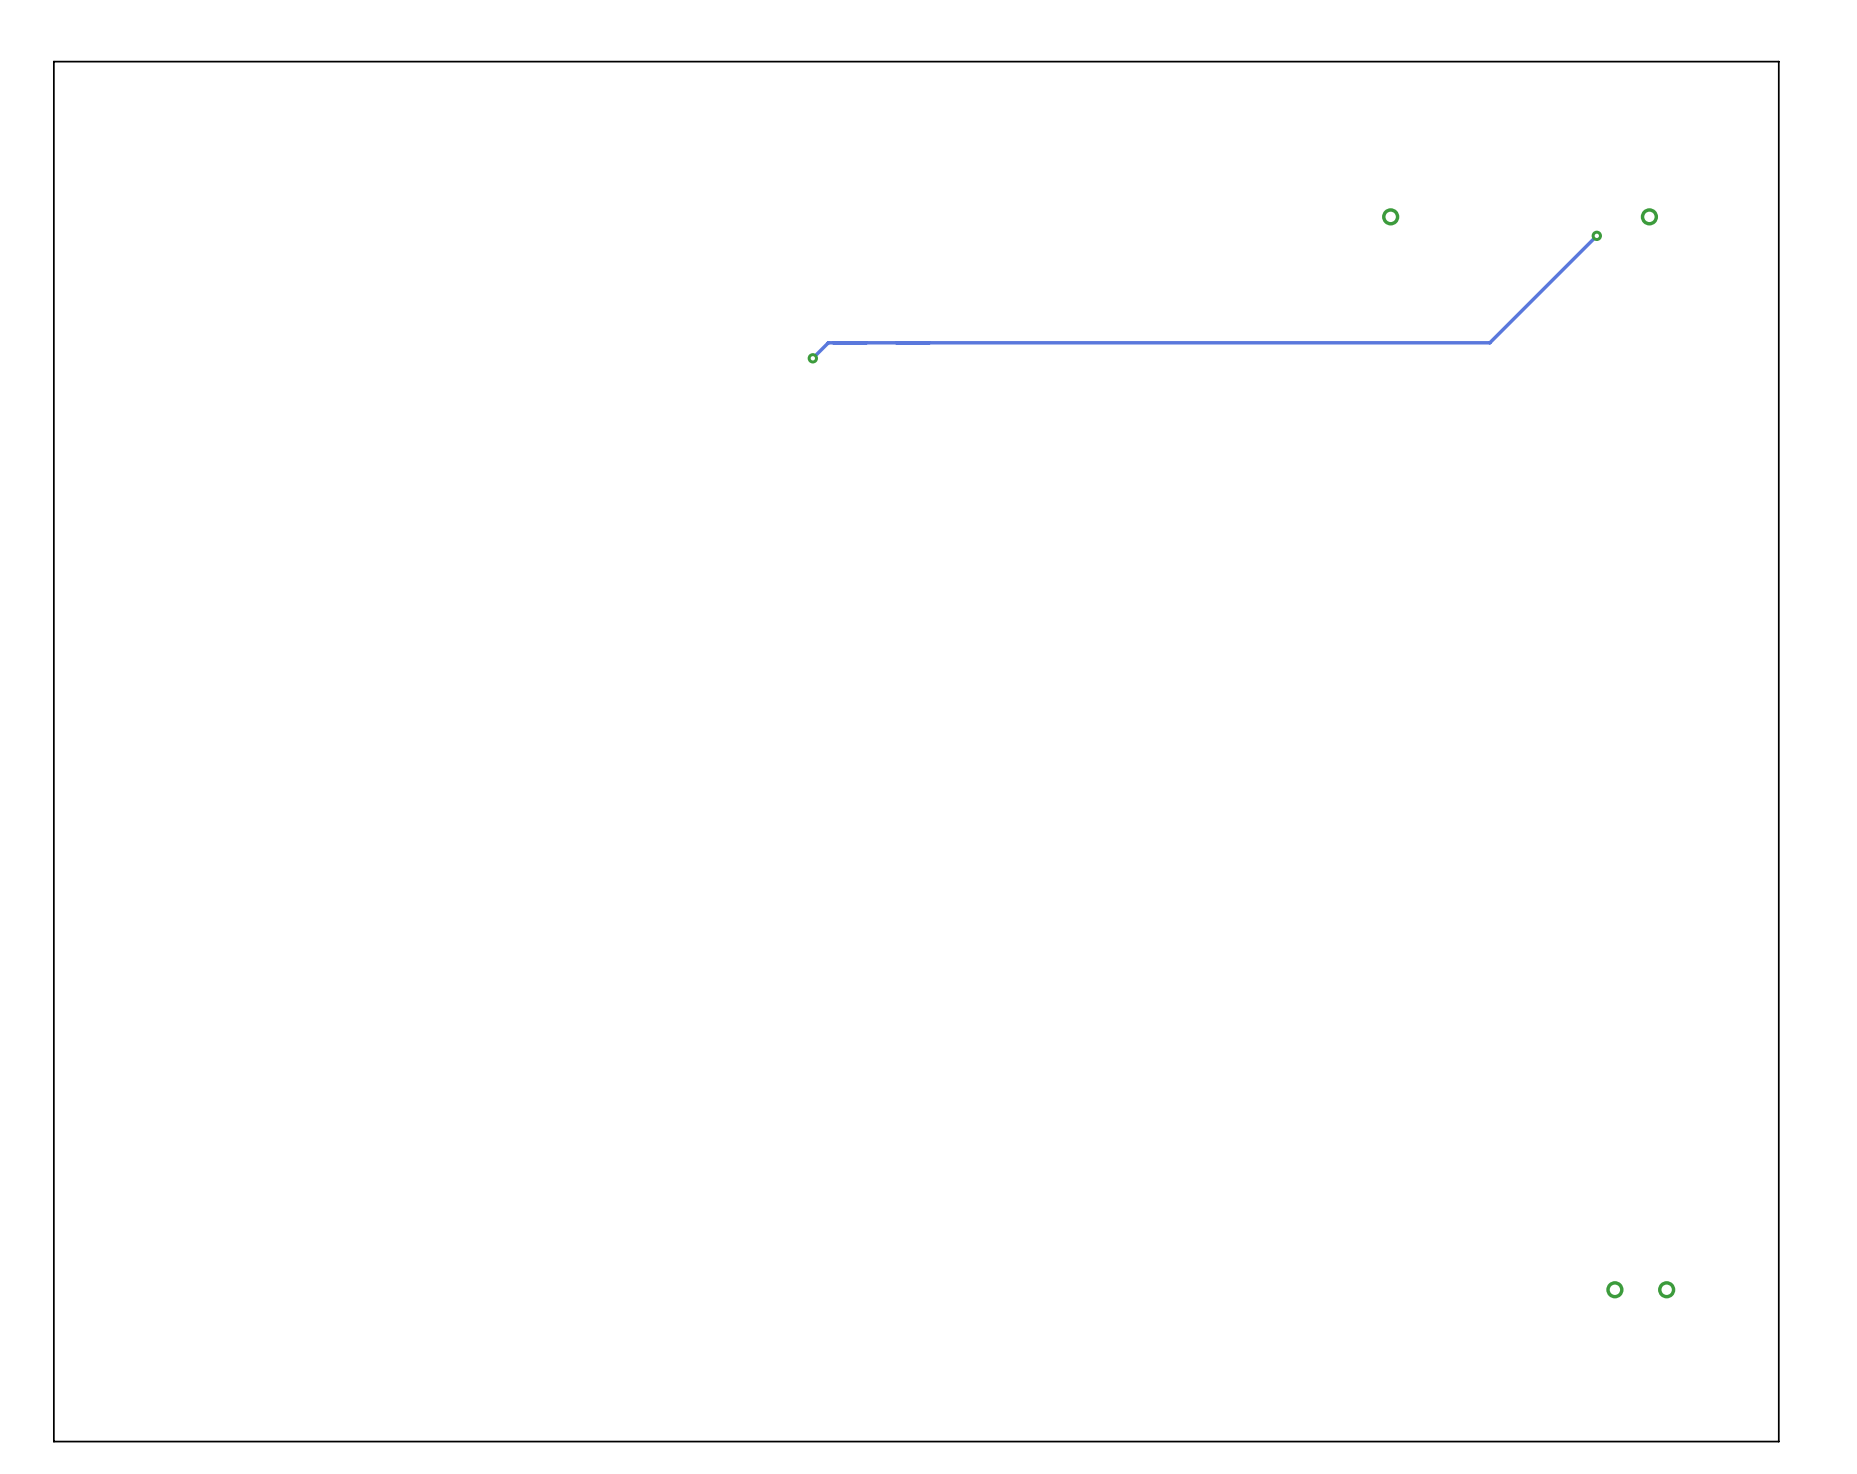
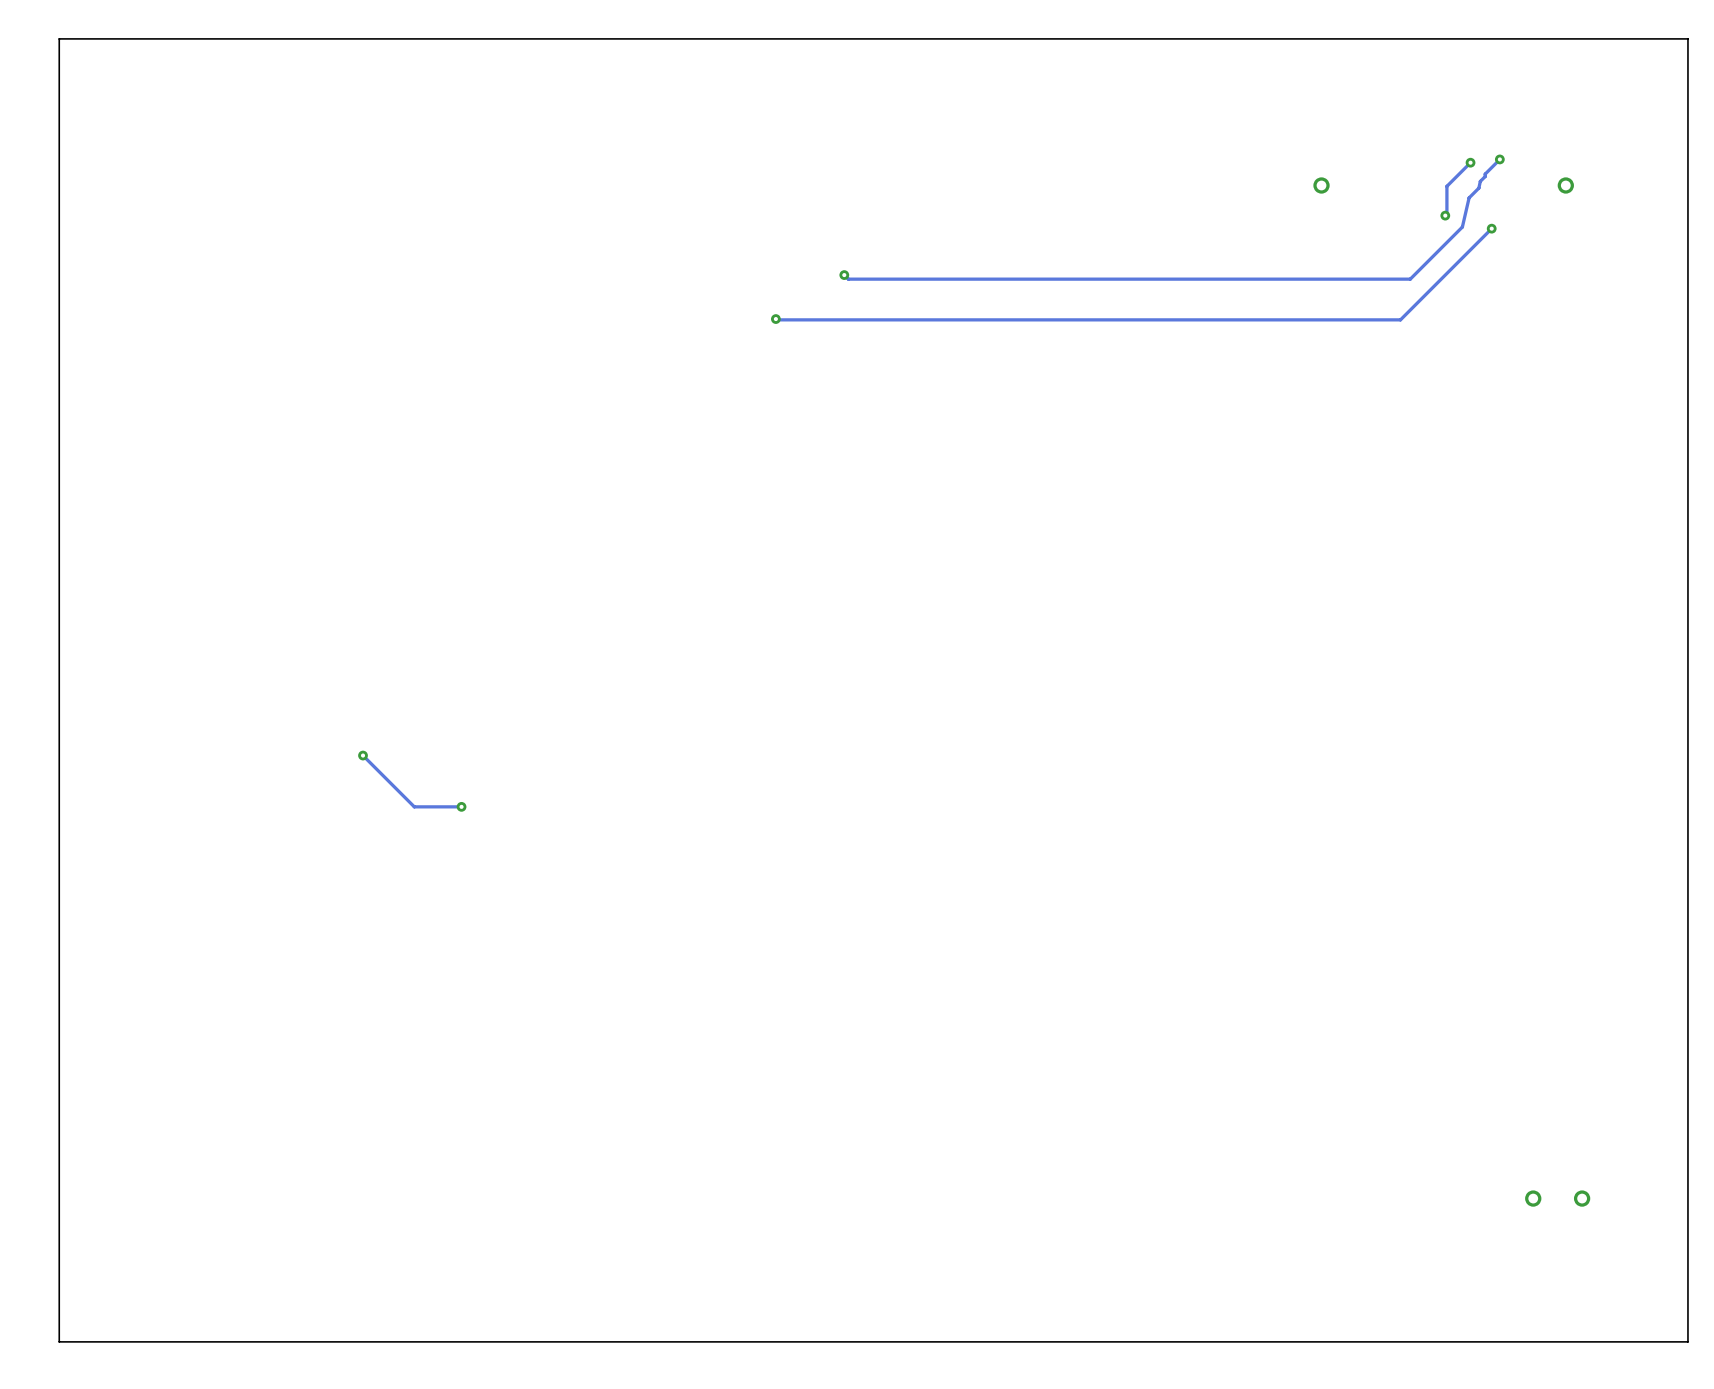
track: none -> (1499, 159) (1485, 174) (1478, 188) (1469, 197) (1462, 227) (1410, 279) (848, 279) (844, 275)
via: none -> (1499, 159)
track: none -> (1470, 162) (1446, 186) (1446, 215) (1445, 215)
via: none -> (1470, 162)
track: (1596, 235) (1489, 342) (828, 342) (812, 358) -> none
via: (1596, 235) -> none
via: none -> (1445, 215)
track: none -> (1491, 228) (1400, 319) (775, 319)
via: none -> (1491, 228)
via: none -> (844, 275)
track: none -> (363, 755) (414, 806) (461, 806)
via: none -> (363, 755)
via: none -> (461, 806)

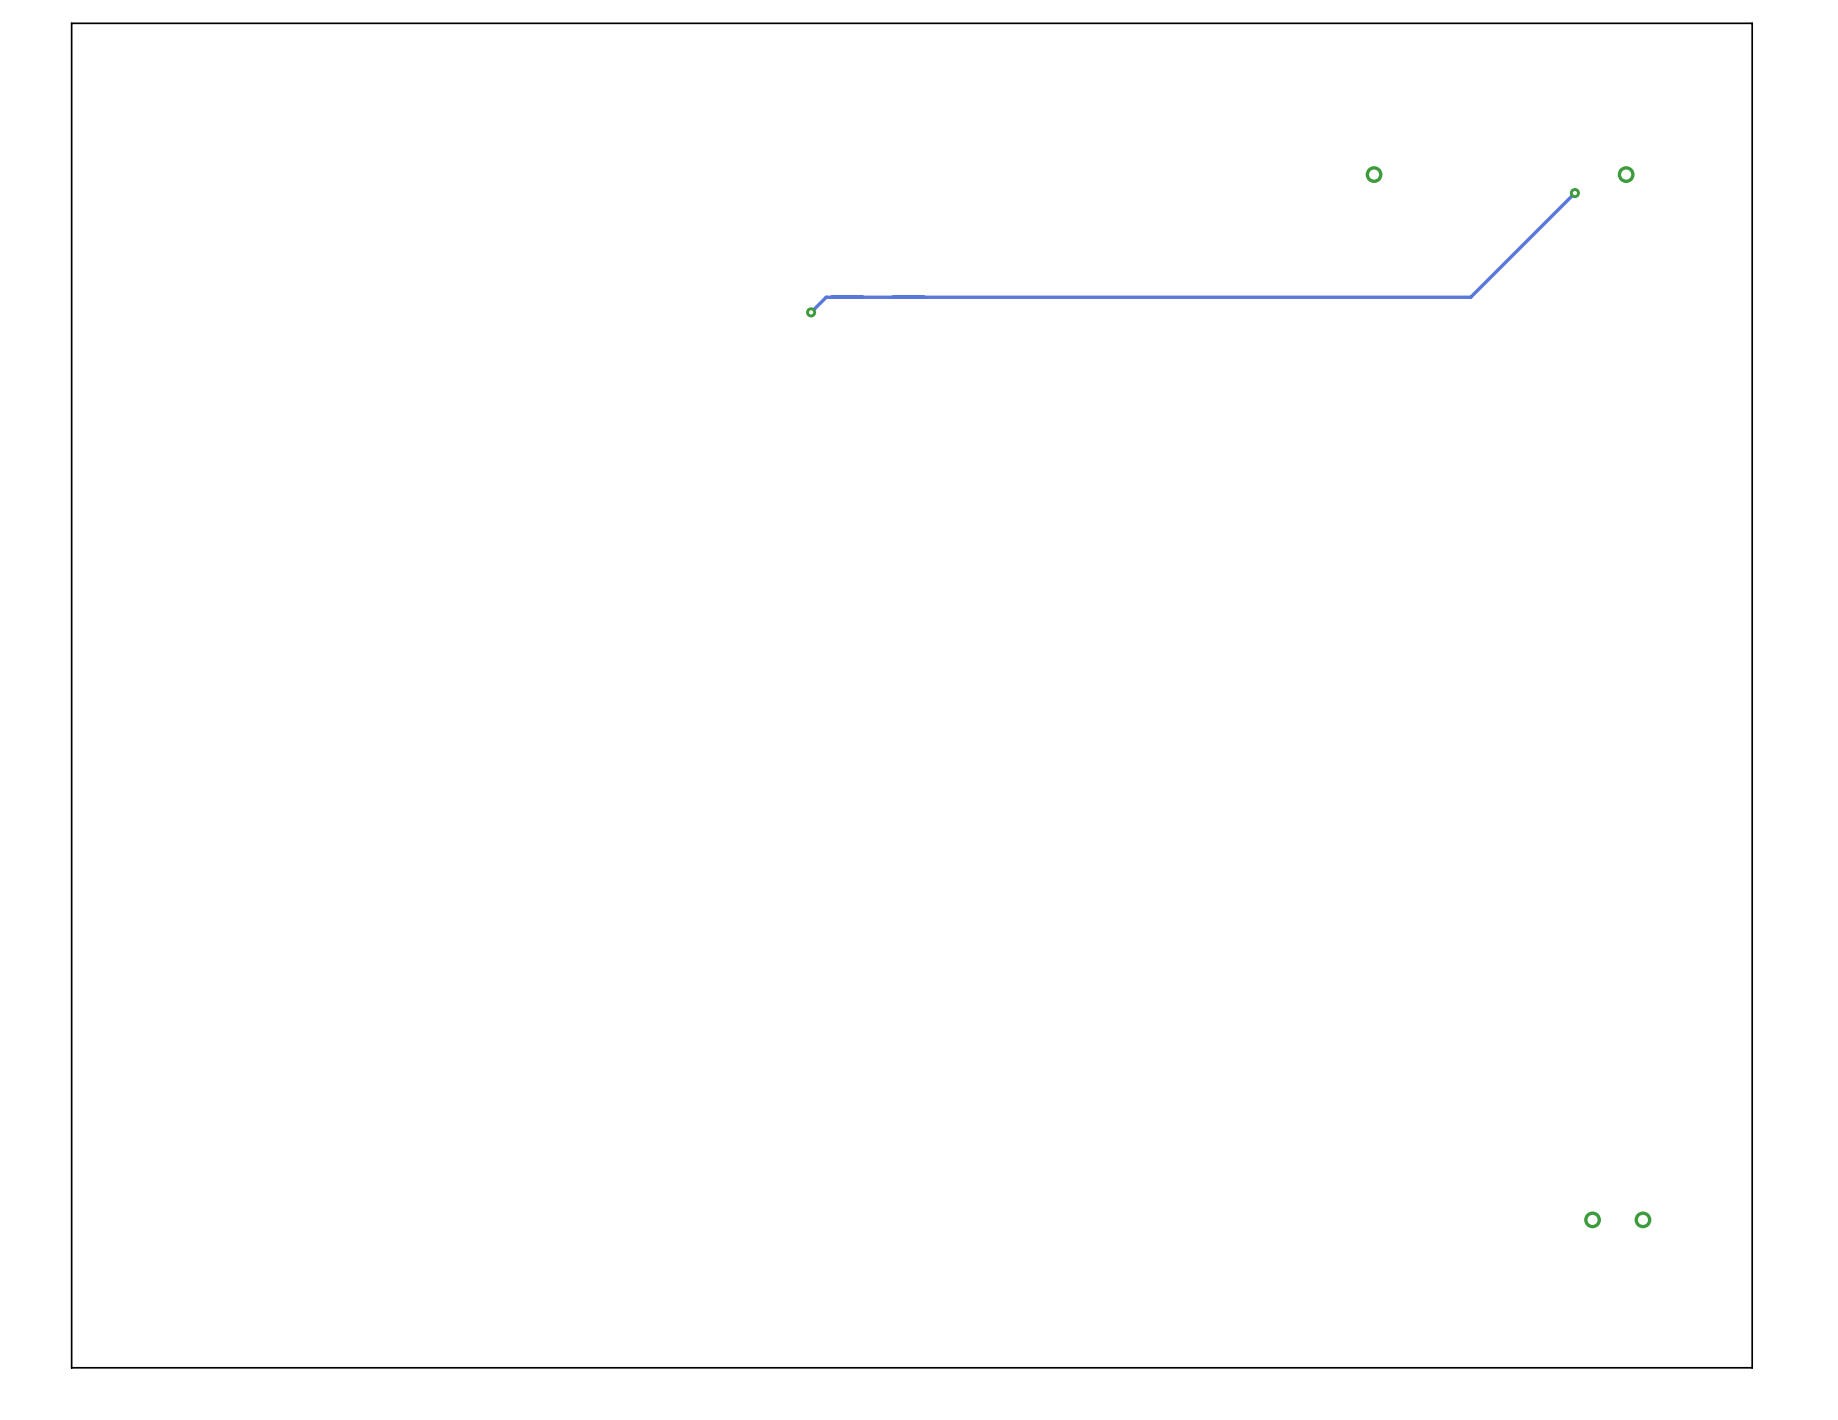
track: (1499, 159) (1485, 174) (1478, 188) (1469, 197) (1462, 227) (1410, 279) (848, 279) (844, 275) -> none
via: (1499, 159) -> none
track: (1470, 162) (1446, 186) (1446, 215) (1445, 215) -> none
via: (1470, 162) -> none
track: none -> (1574, 193) (1470, 297) (826, 297) (811, 312)
via: none -> (1574, 193)
via: (1445, 215) -> none
track: (1491, 228) (1400, 319) (775, 319) -> none
via: (1491, 228) -> none
via: (844, 275) -> none
track: (363, 755) (414, 806) (461, 806) -> none
via: (363, 755) -> none
via: (461, 806) -> none

